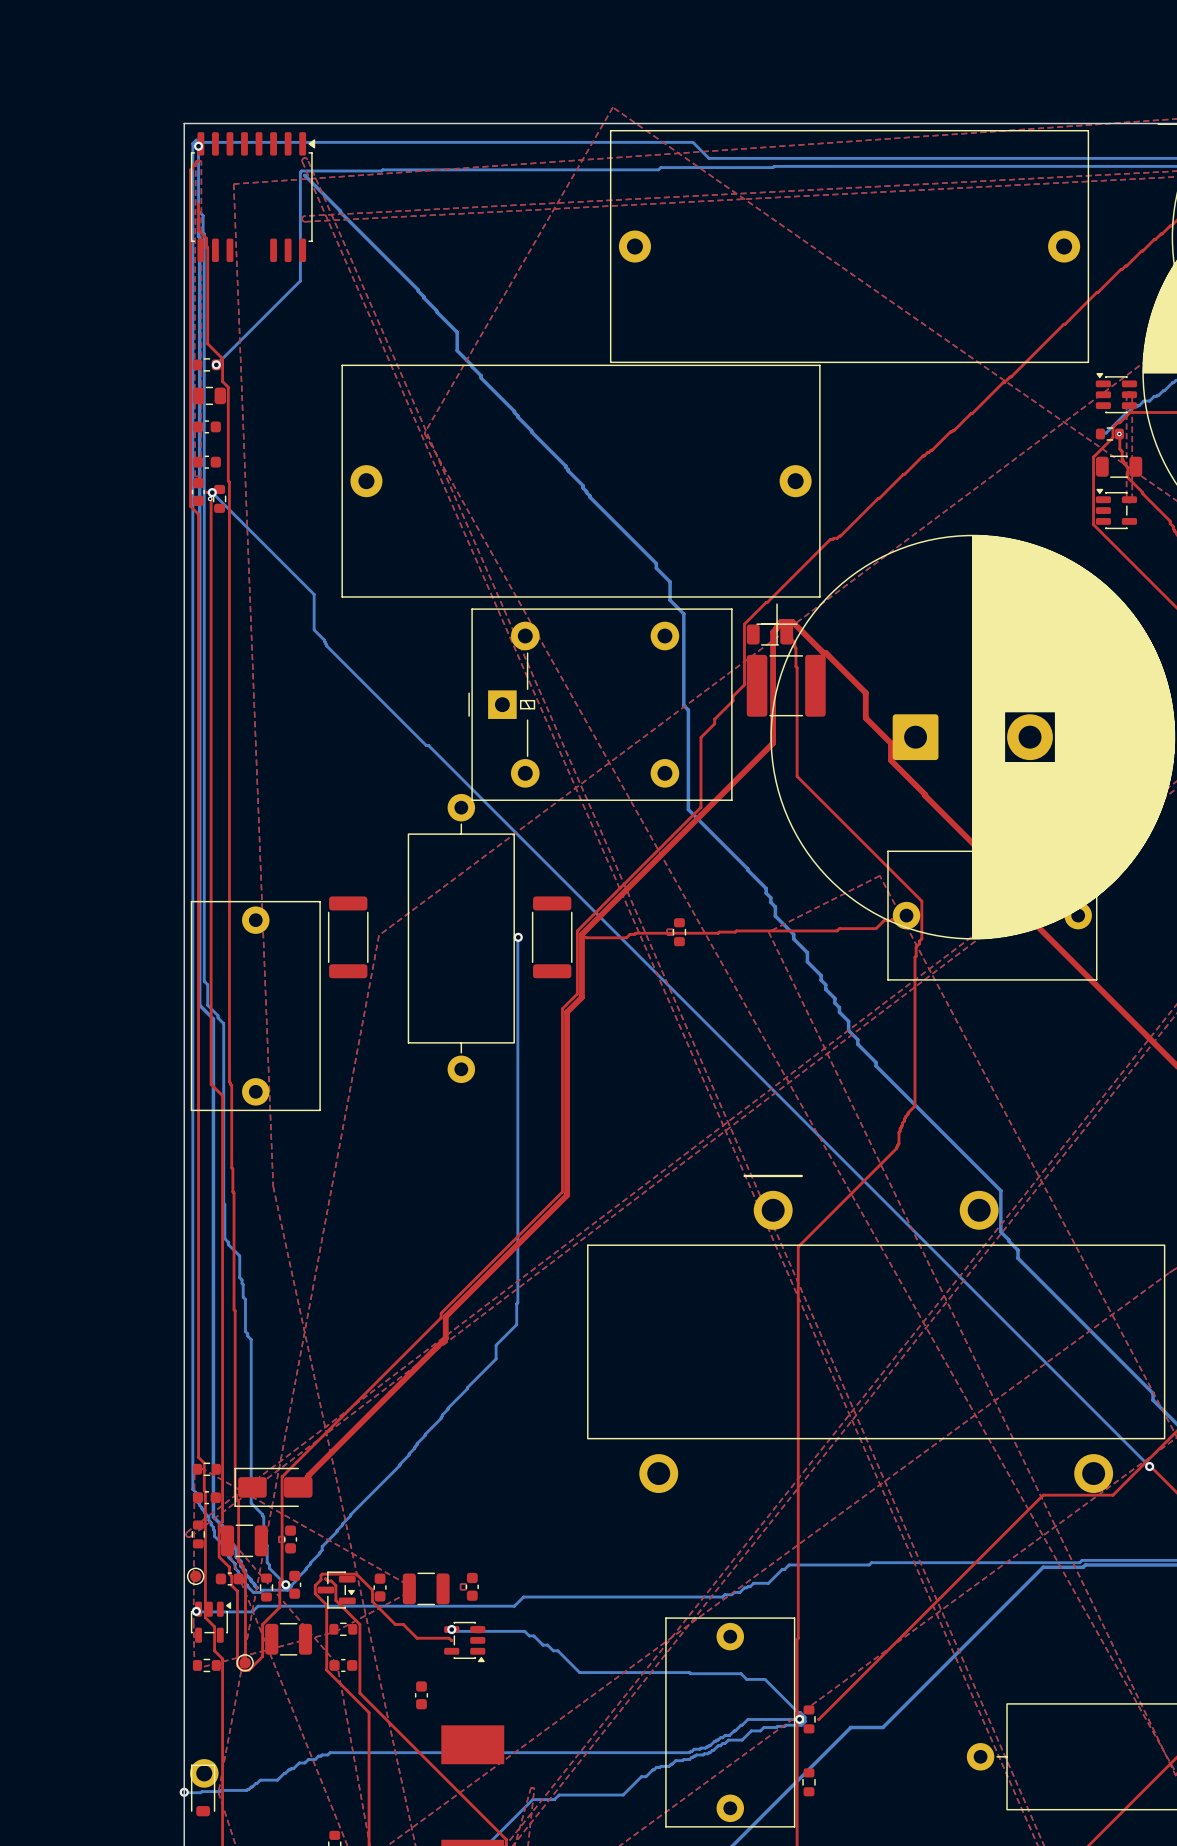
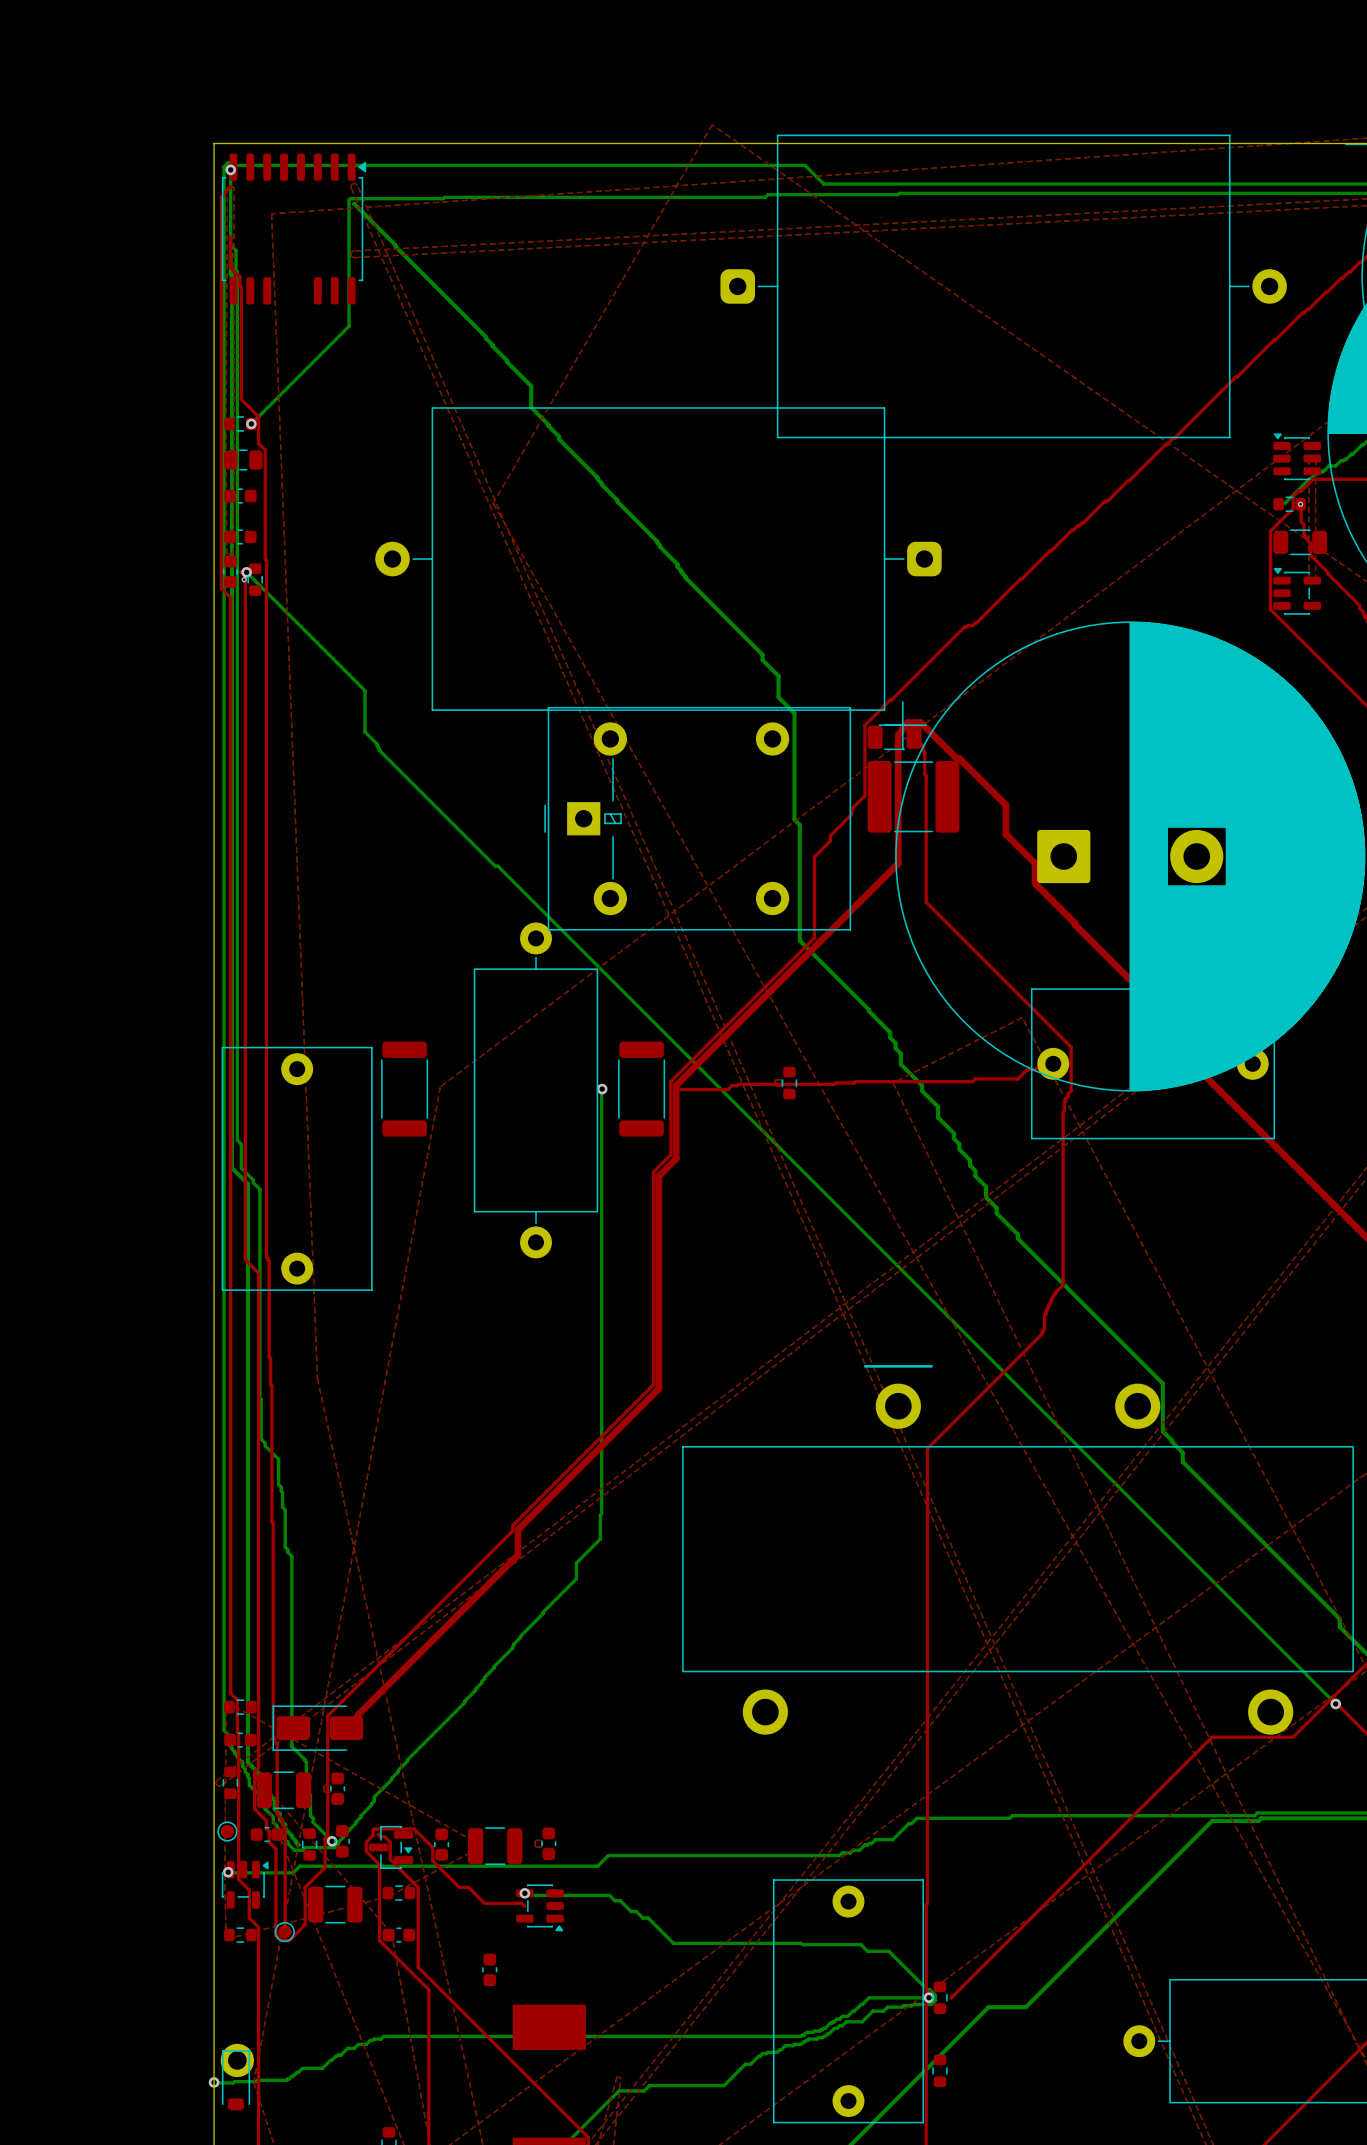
part: (849, 246) -> none
part: none -> (1003, 286)
part: none -> (658, 559)
part: (581, 481) -> none

